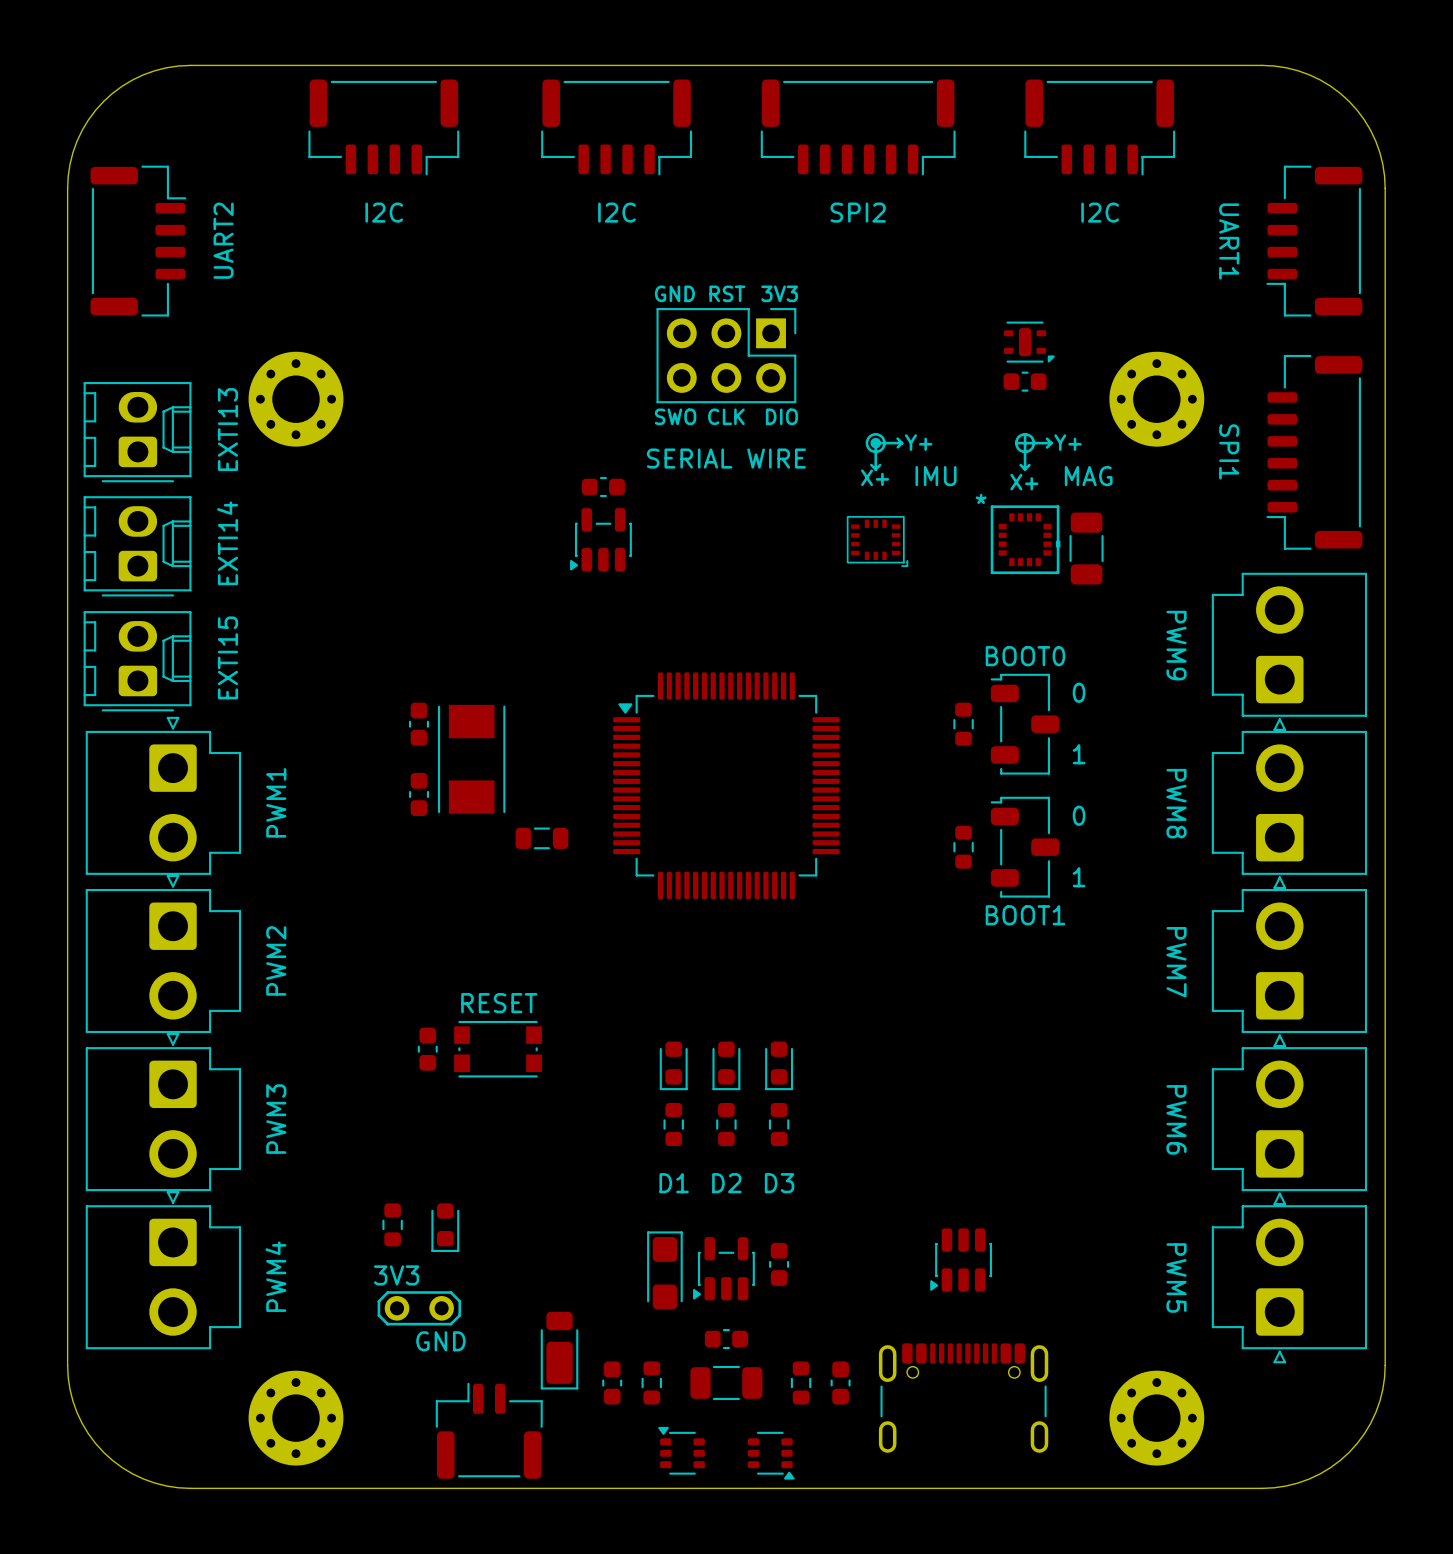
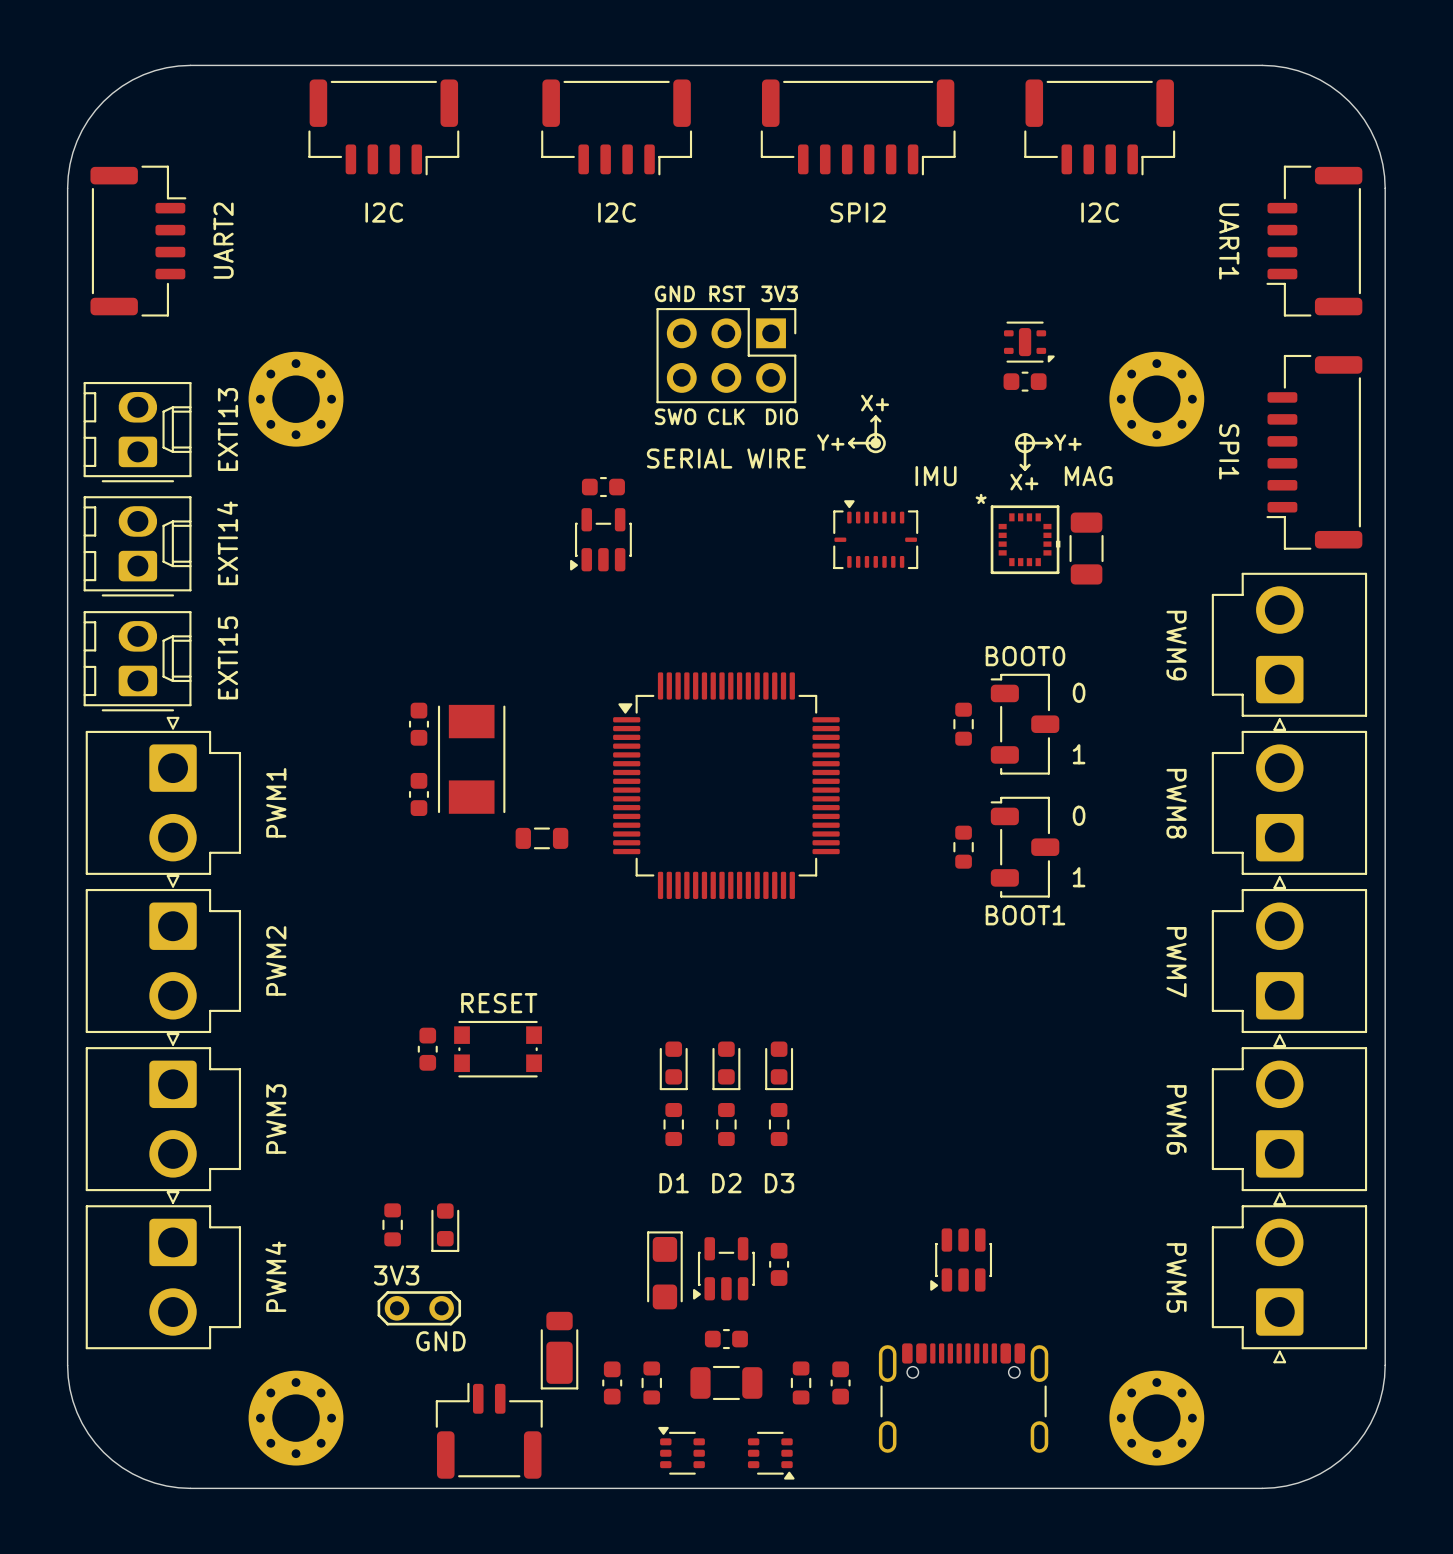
line: none -> (875, 416) (875, 443) (849, 443)
line: (897, 438) (902, 443) -> (875, 416) (880, 421)
text position: Y+ (918, 442) -> Y+ (830, 442)
line: (902, 443) (897, 447) -> (875, 416) (871, 421)
line: (902, 443) (875, 443) (875, 469) -> none
line: (871, 465) (875, 469) -> (849, 443) (853, 447)
line: (880, 465) (875, 469) -> (853, 438) (849, 443)
text position: X+ (875, 477) -> X+ (875, 403)
part footprint: [846, 516, 909, 567] -> [833, 500, 919, 570]

